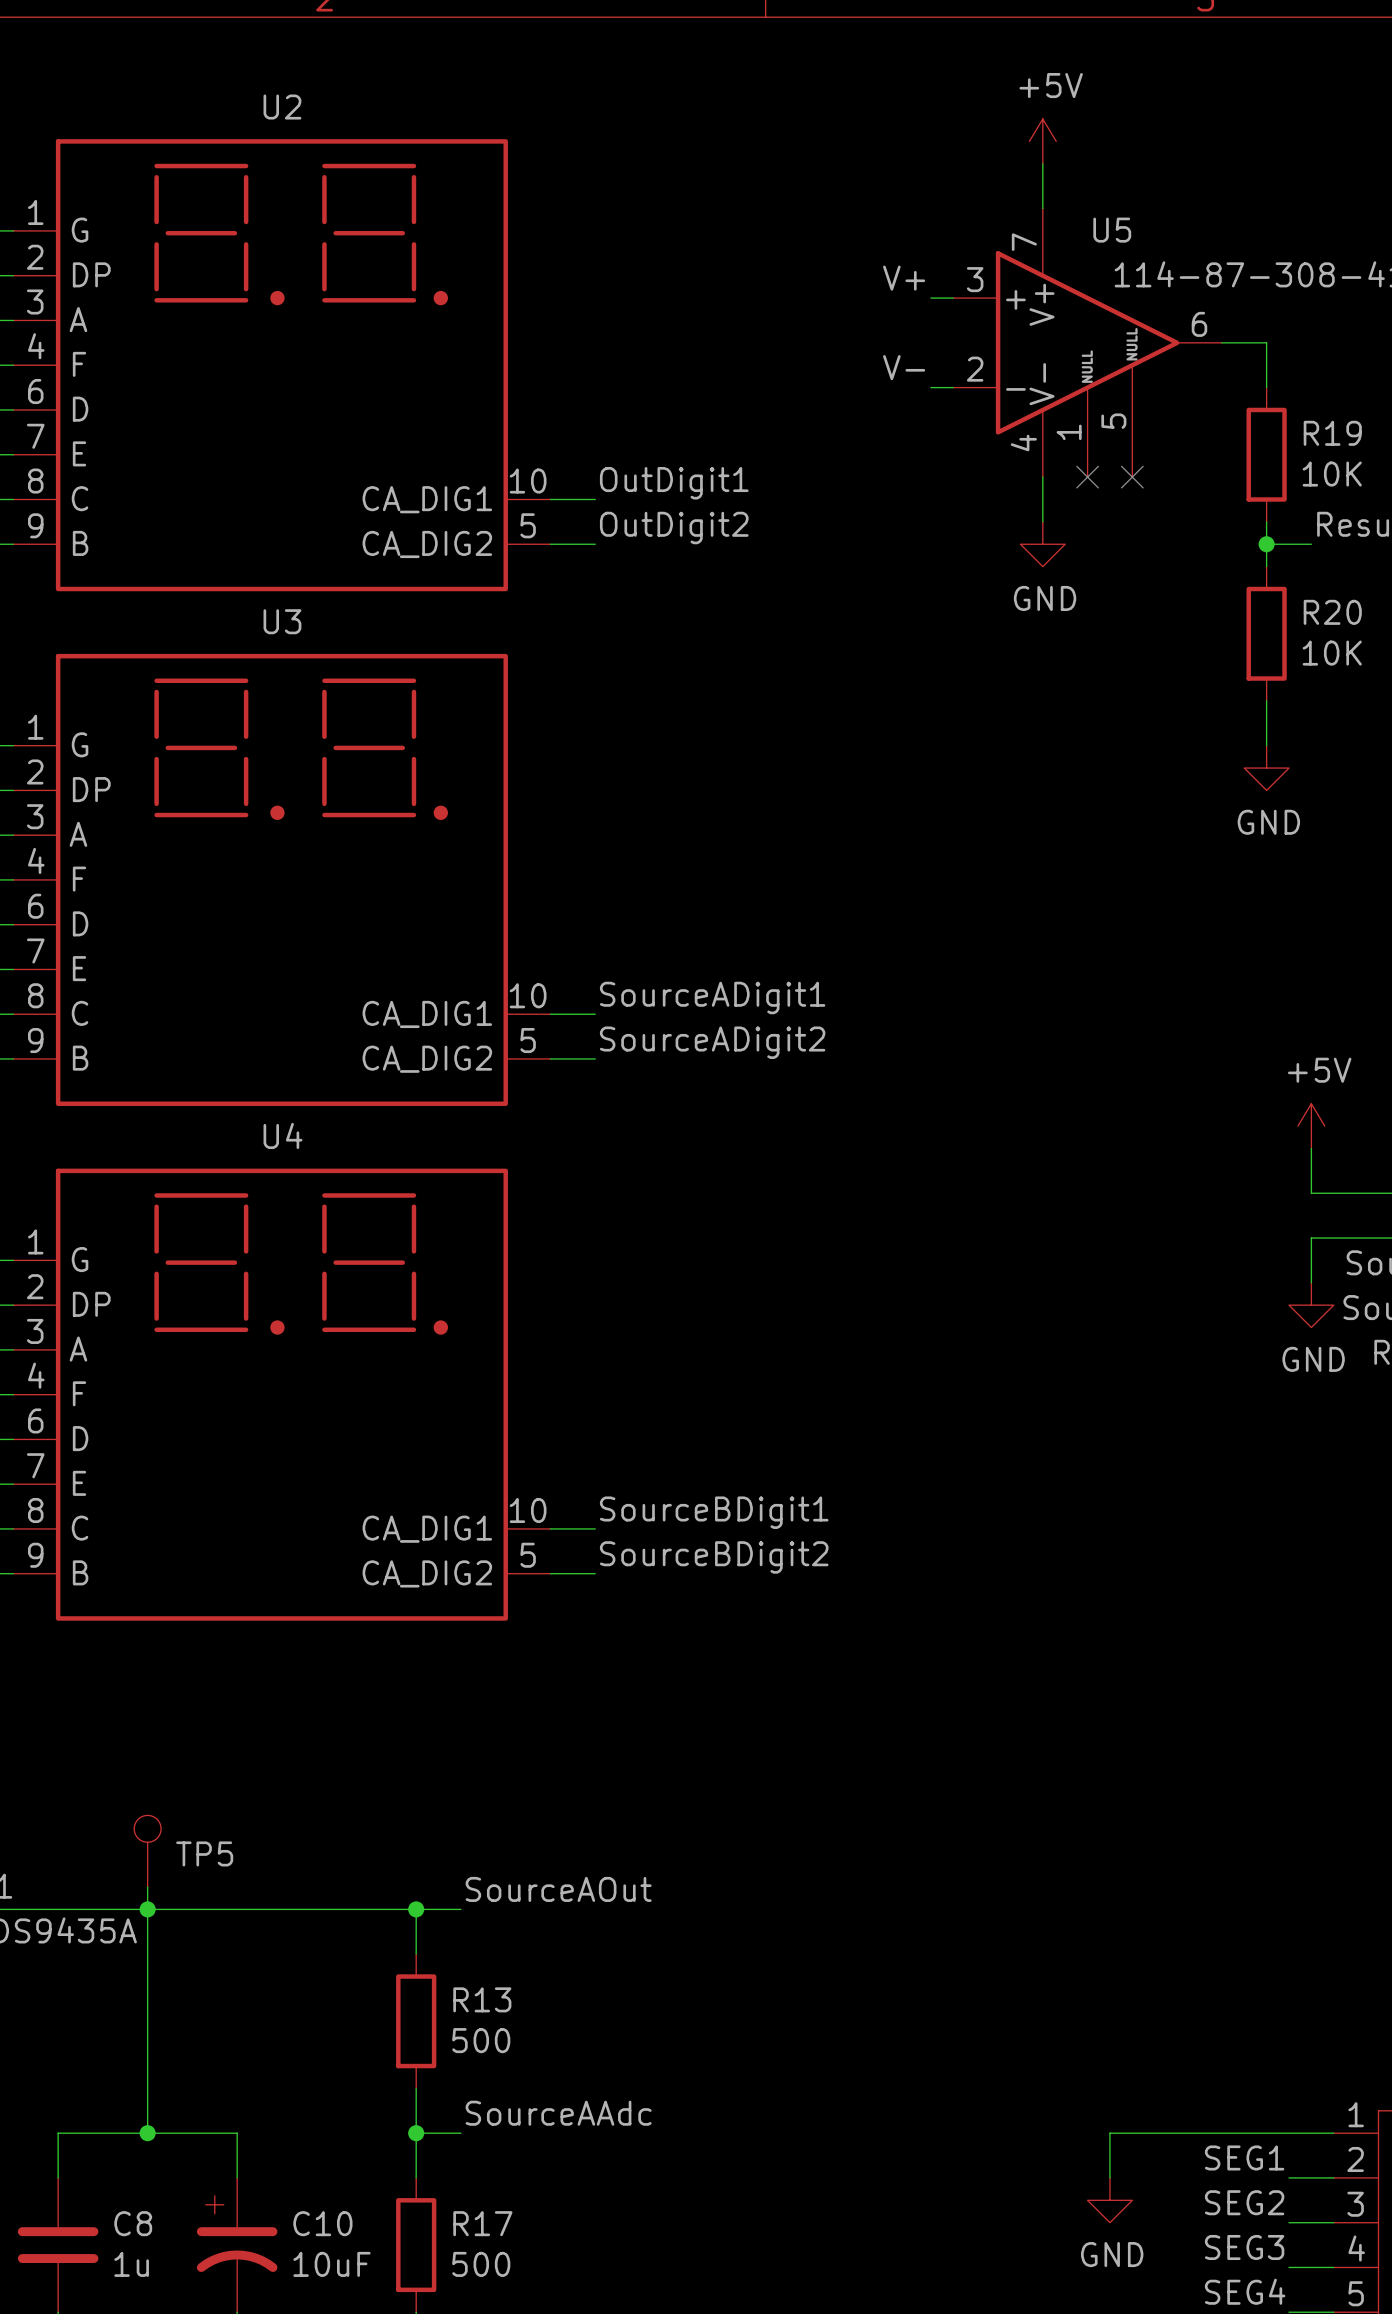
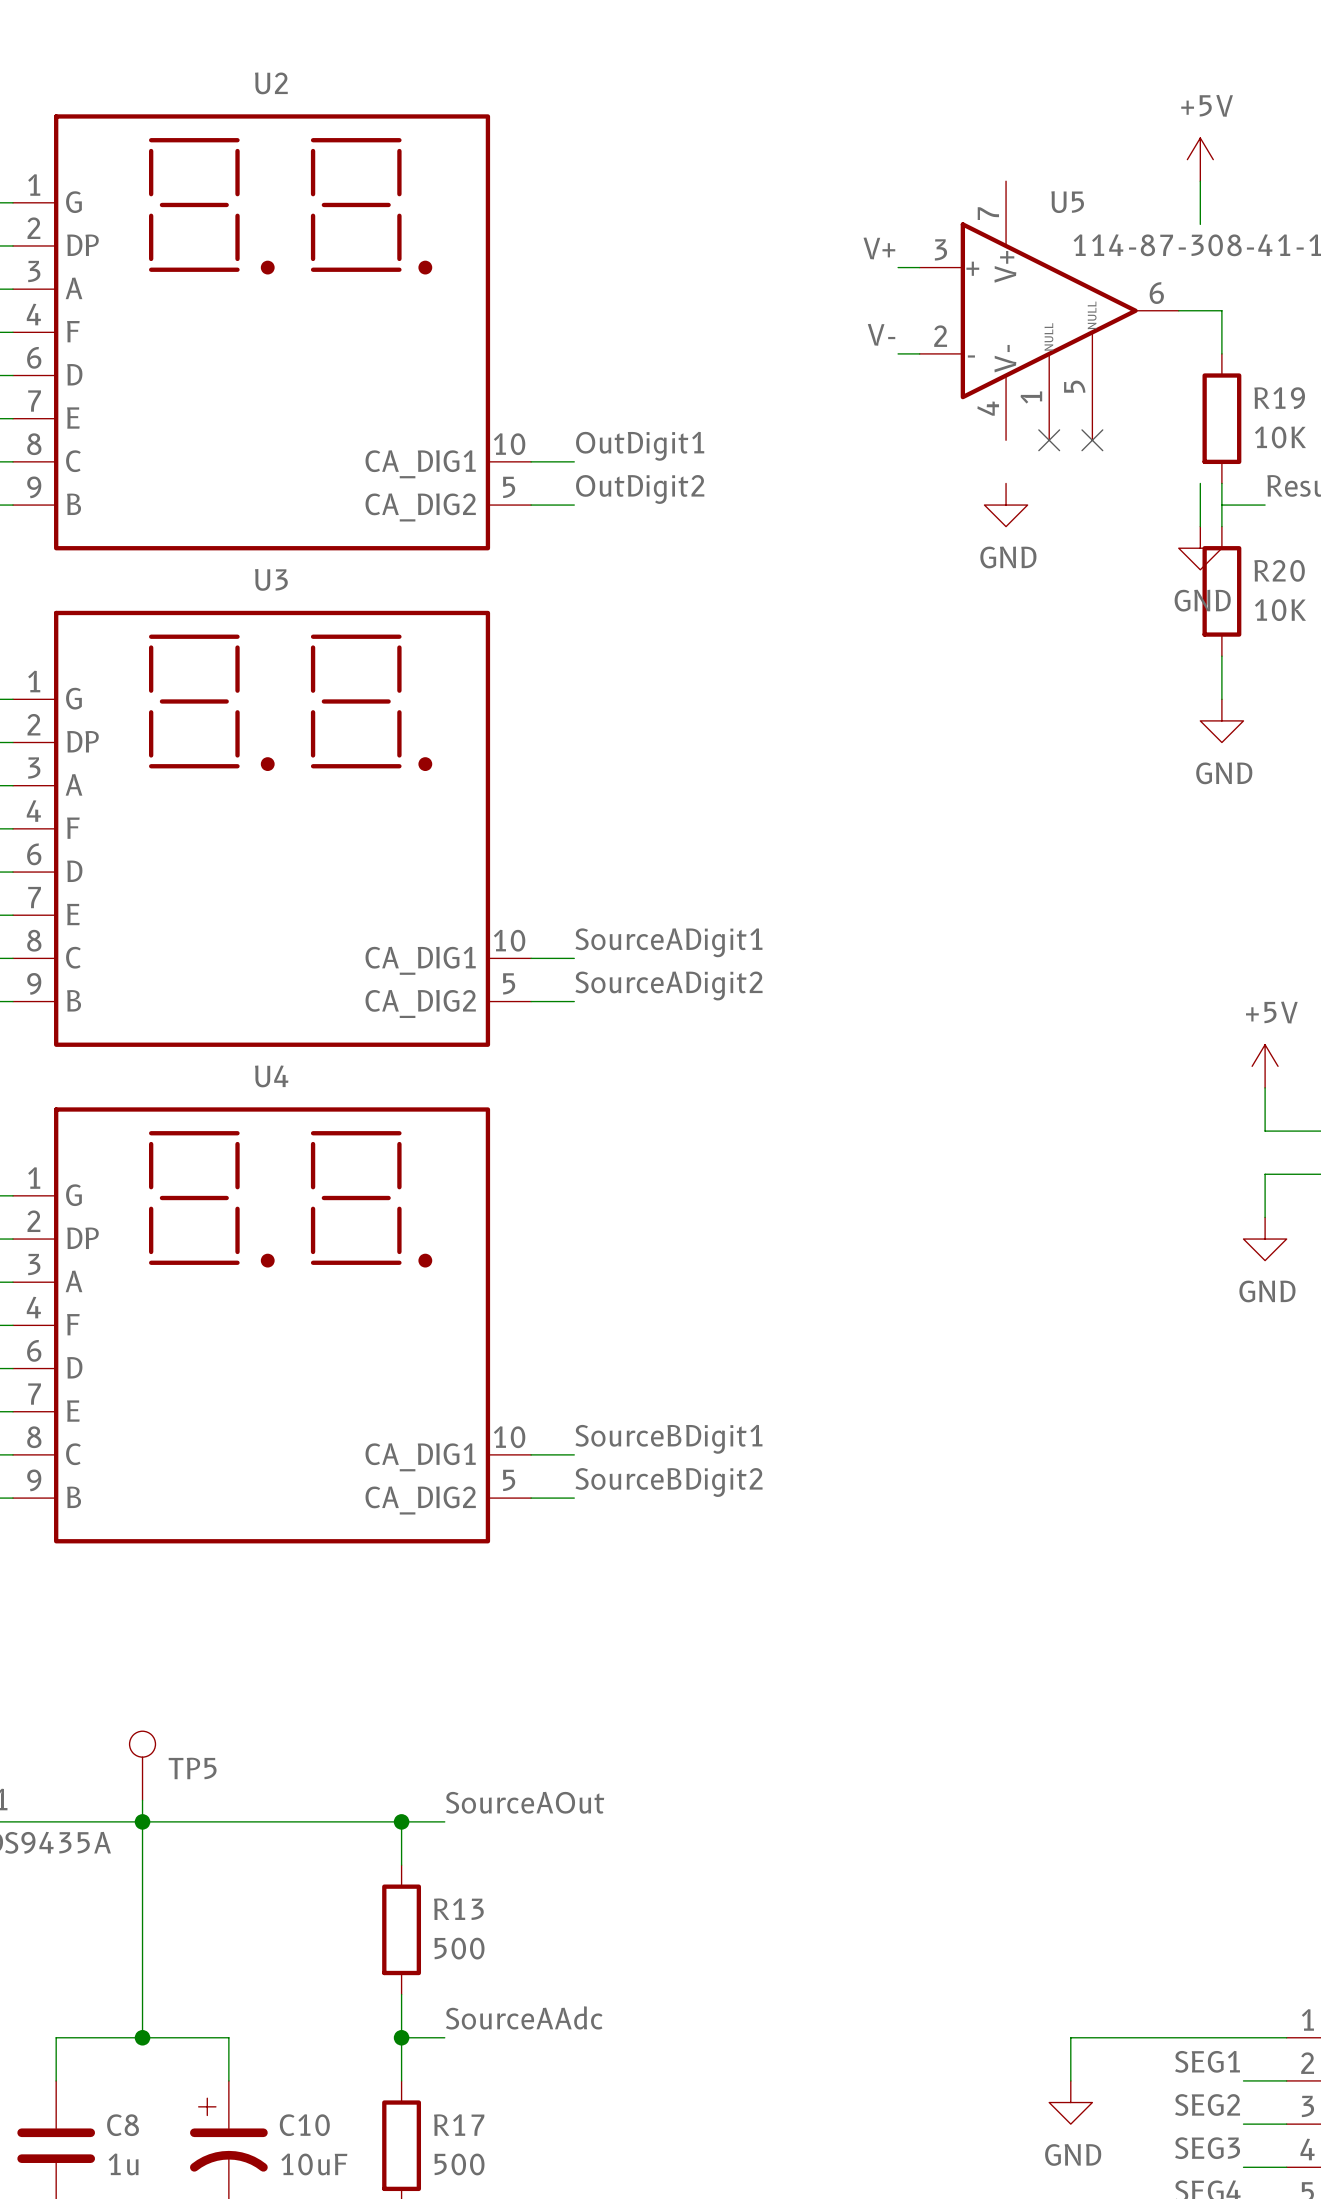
power symbol position: +5V (1042, 141) -> +5V (1200, 159)
wire: (1042, 163) (1042, 208) -> (1200, 181) (1200, 224)
wire: (1042, 477) (1042, 521) -> (1200, 483) (1200, 526)
junction: (1266, 544) -> none
power symbol: none -> GND (1200, 548)

